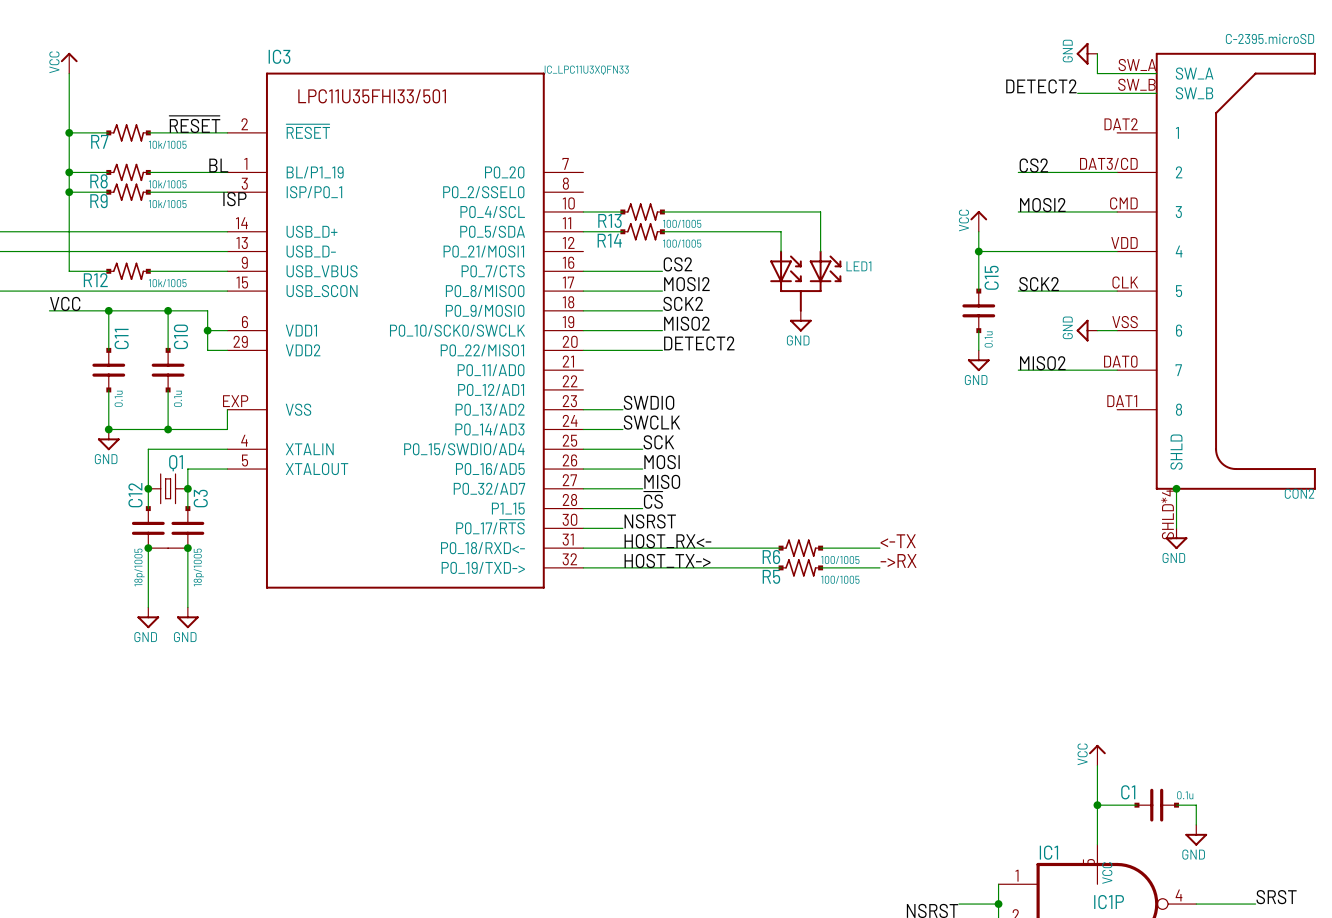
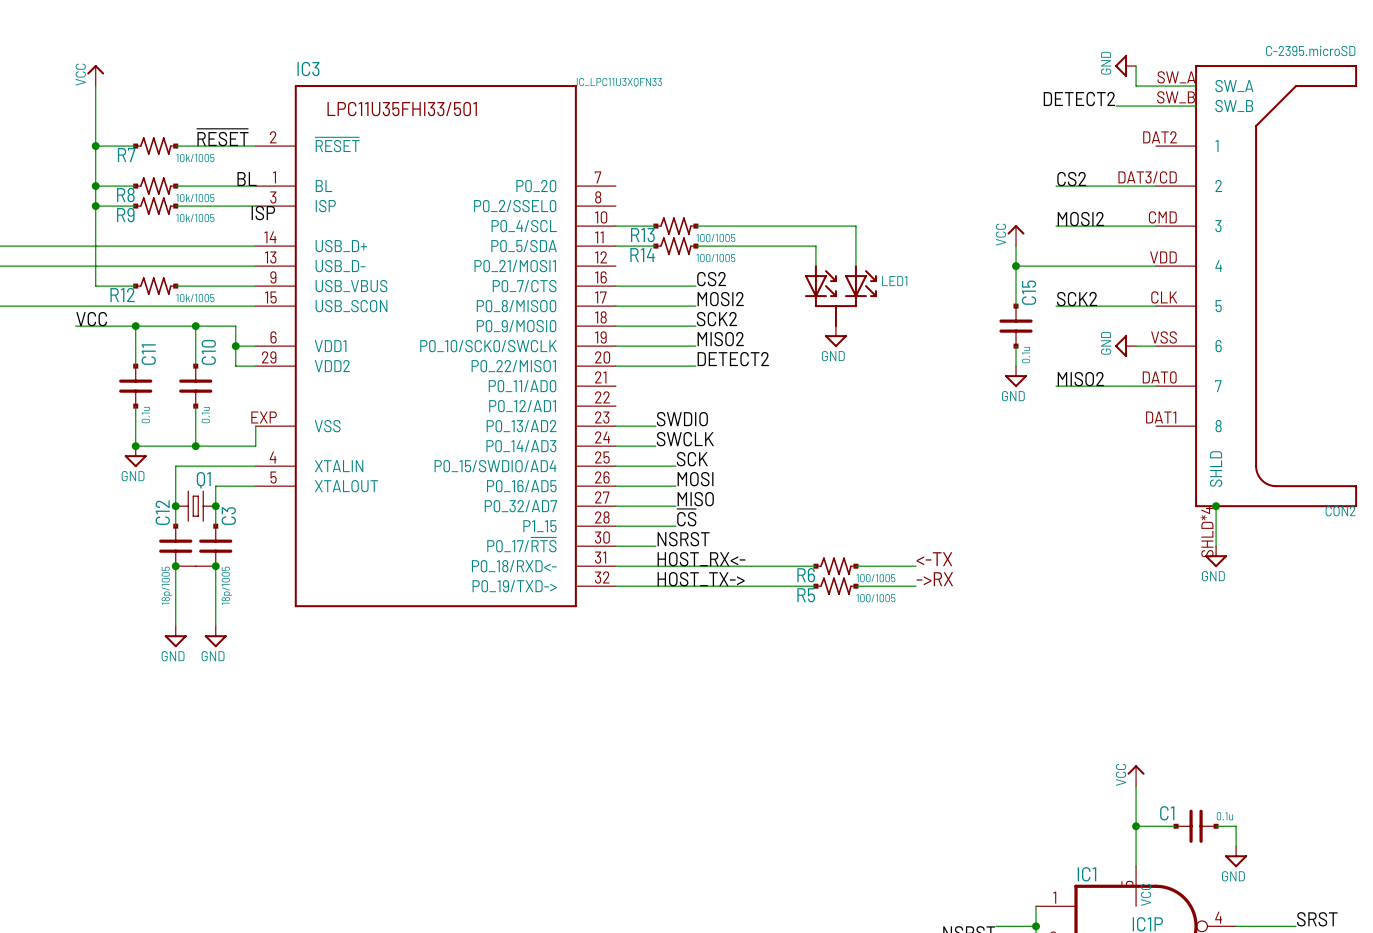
IC3 pin name: BL/P1_19 (315, 172) -> BL (323, 186)
IC3 pin name: ISP/P0_1 (314, 192) -> ISP (325, 206)

